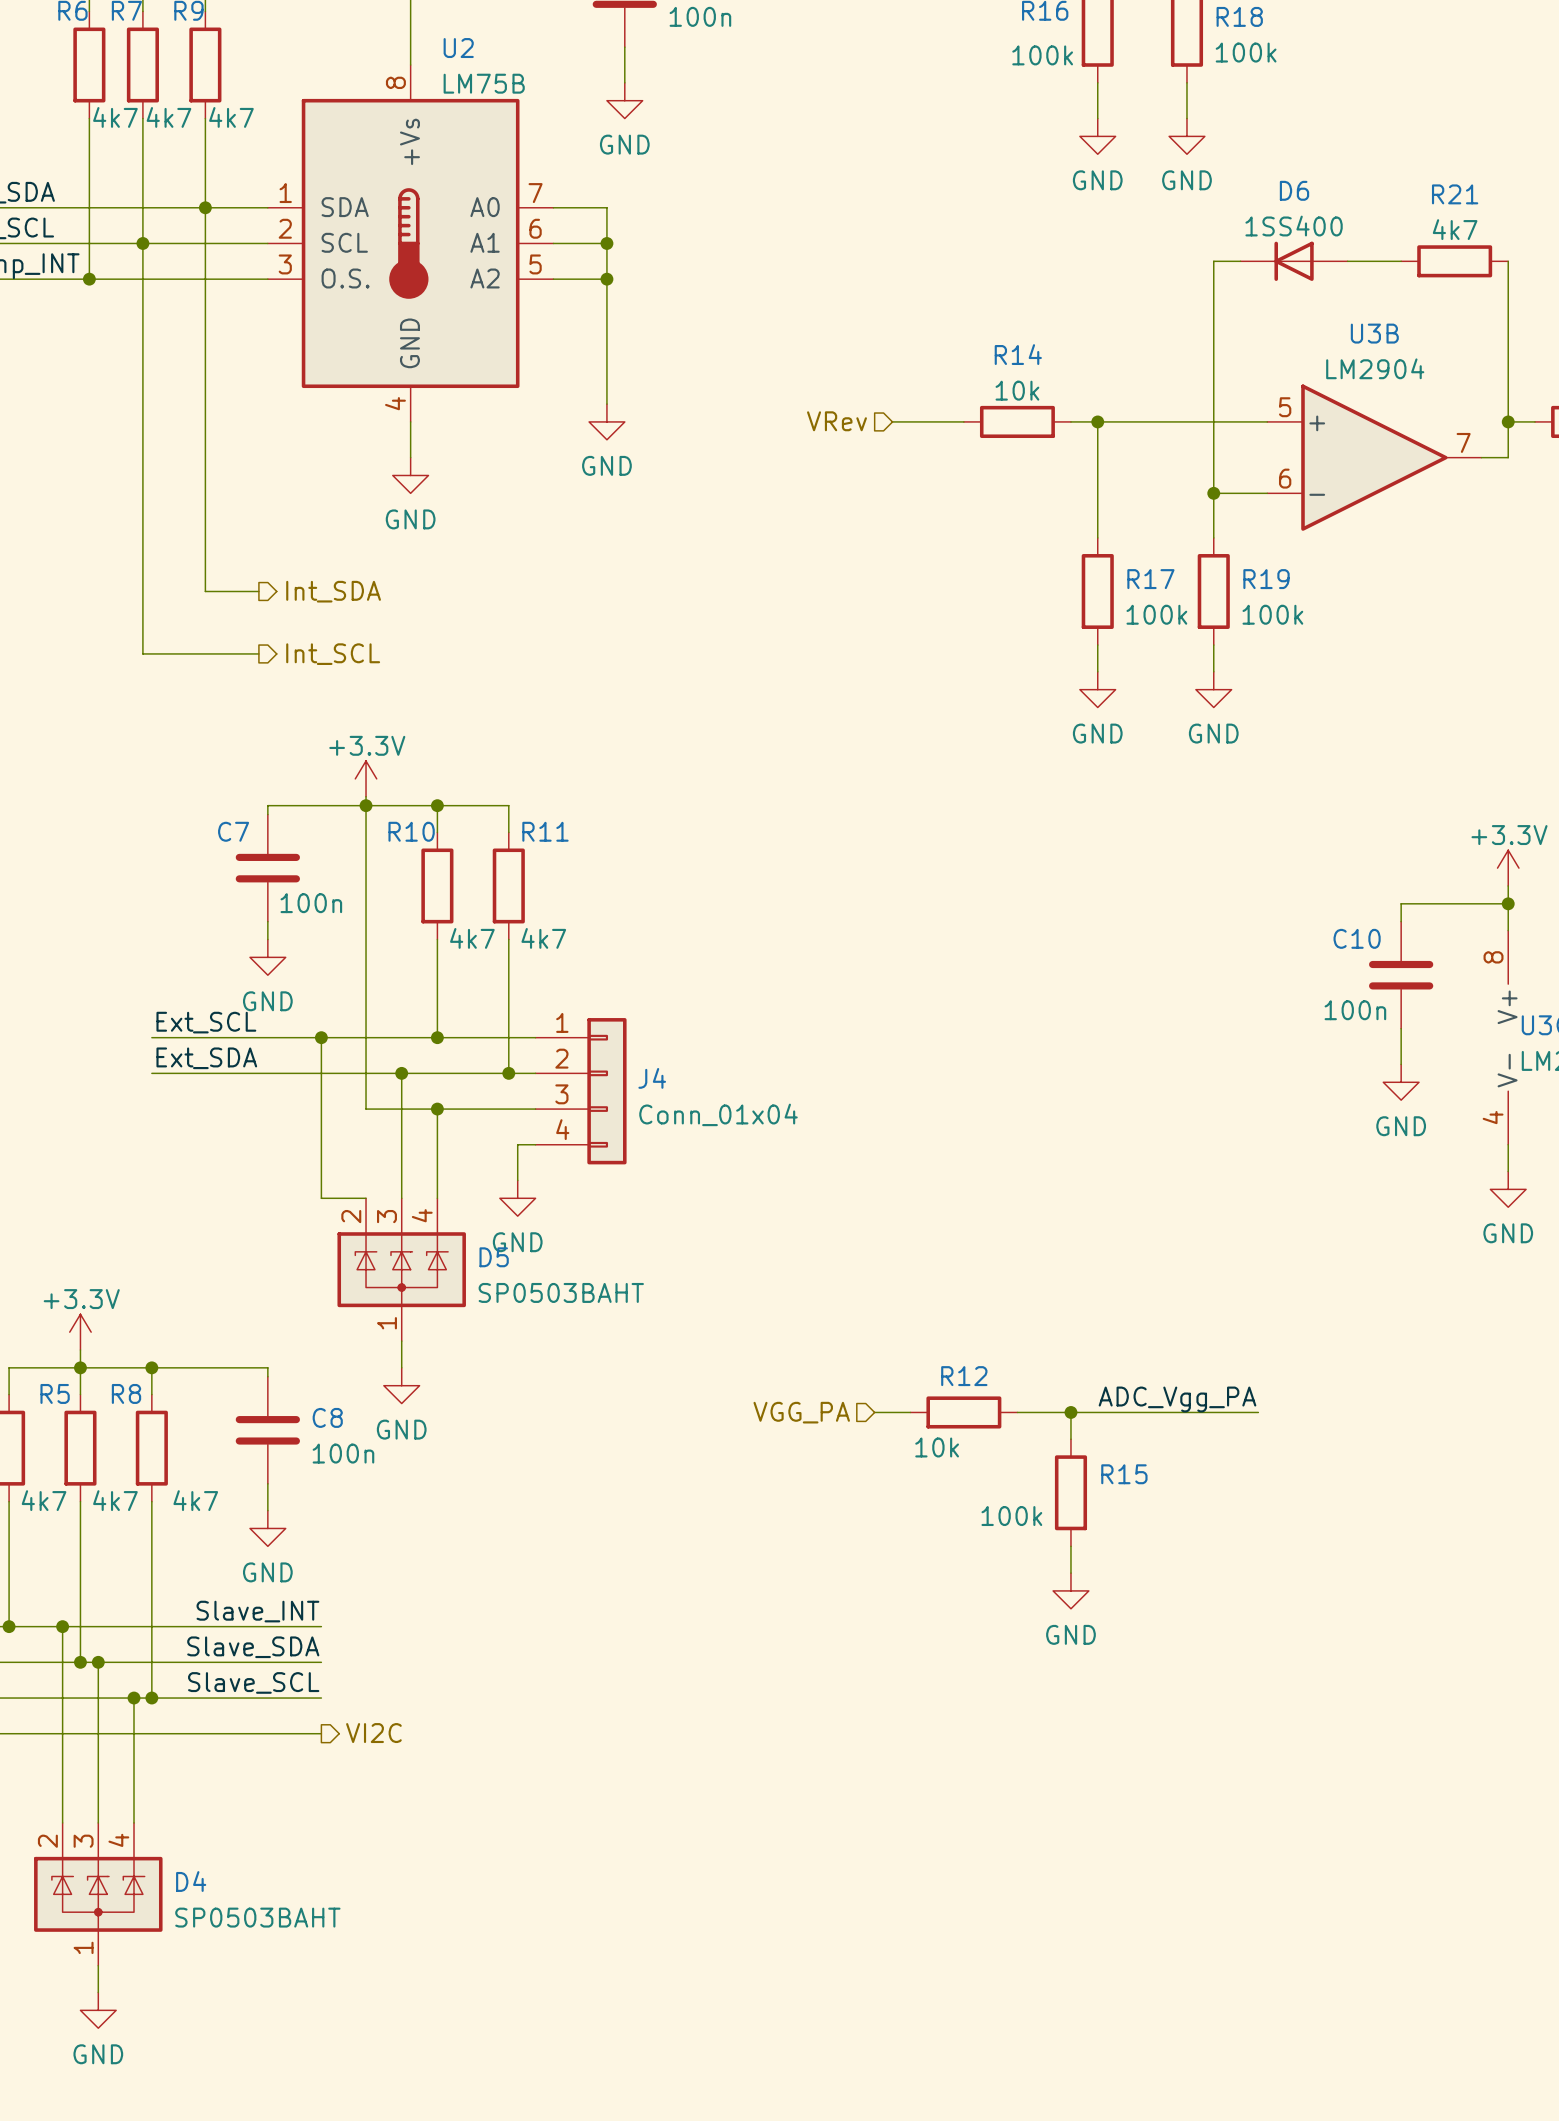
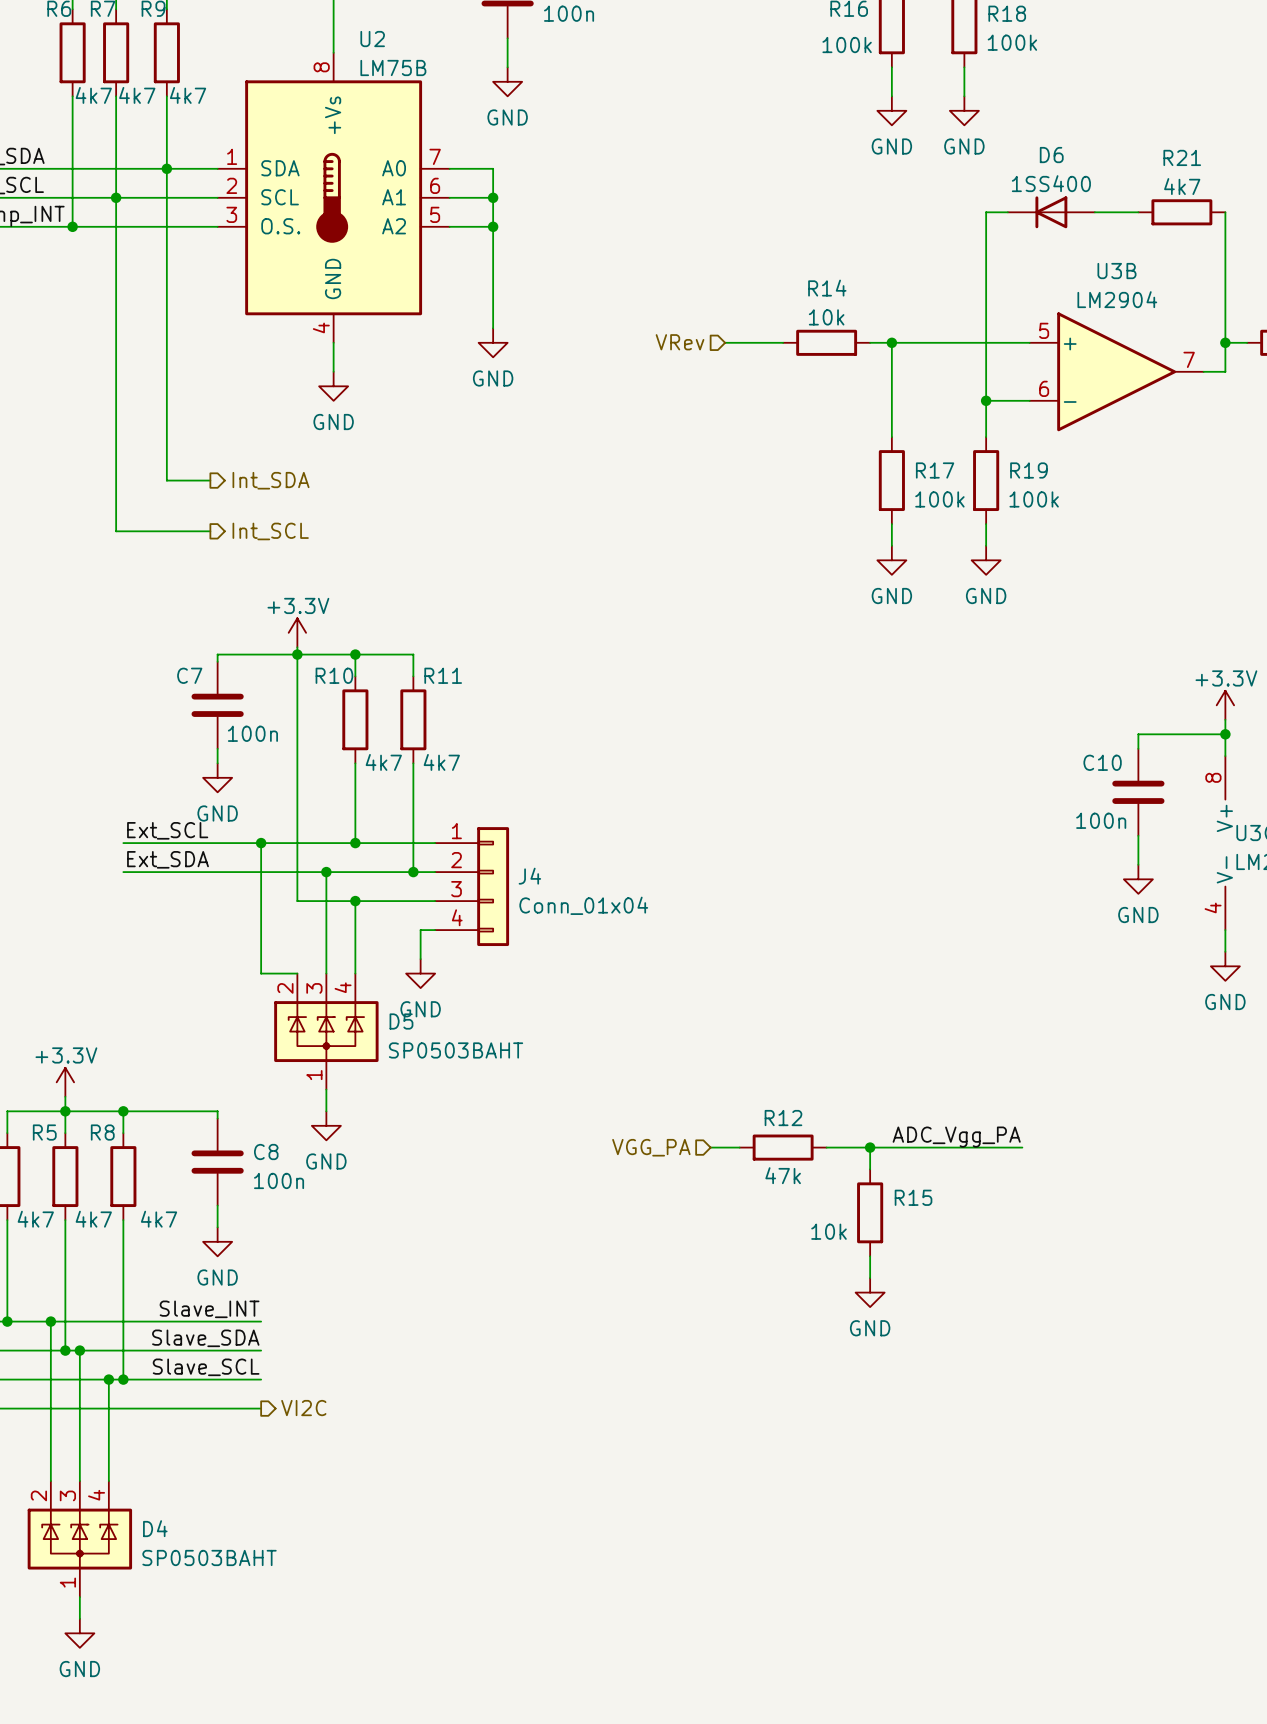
R12 value: 10k (937, 1447) -> 47k (783, 1175)
R15 value: 100k (1011, 1516) -> 10k (829, 1231)

